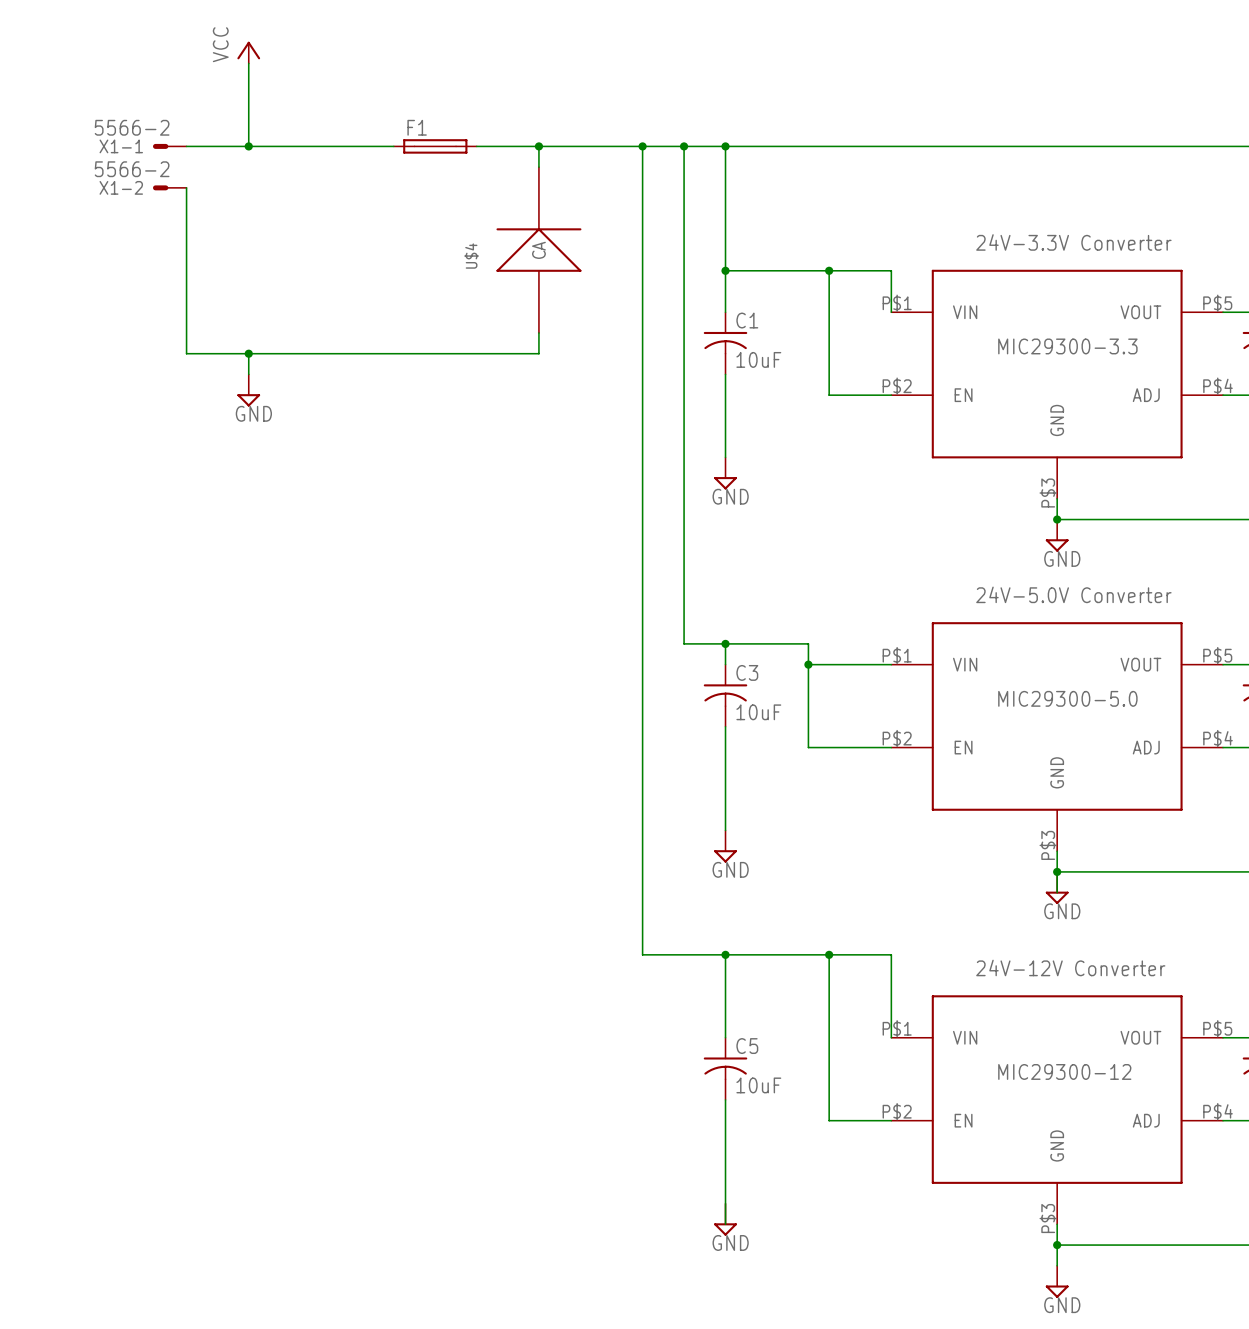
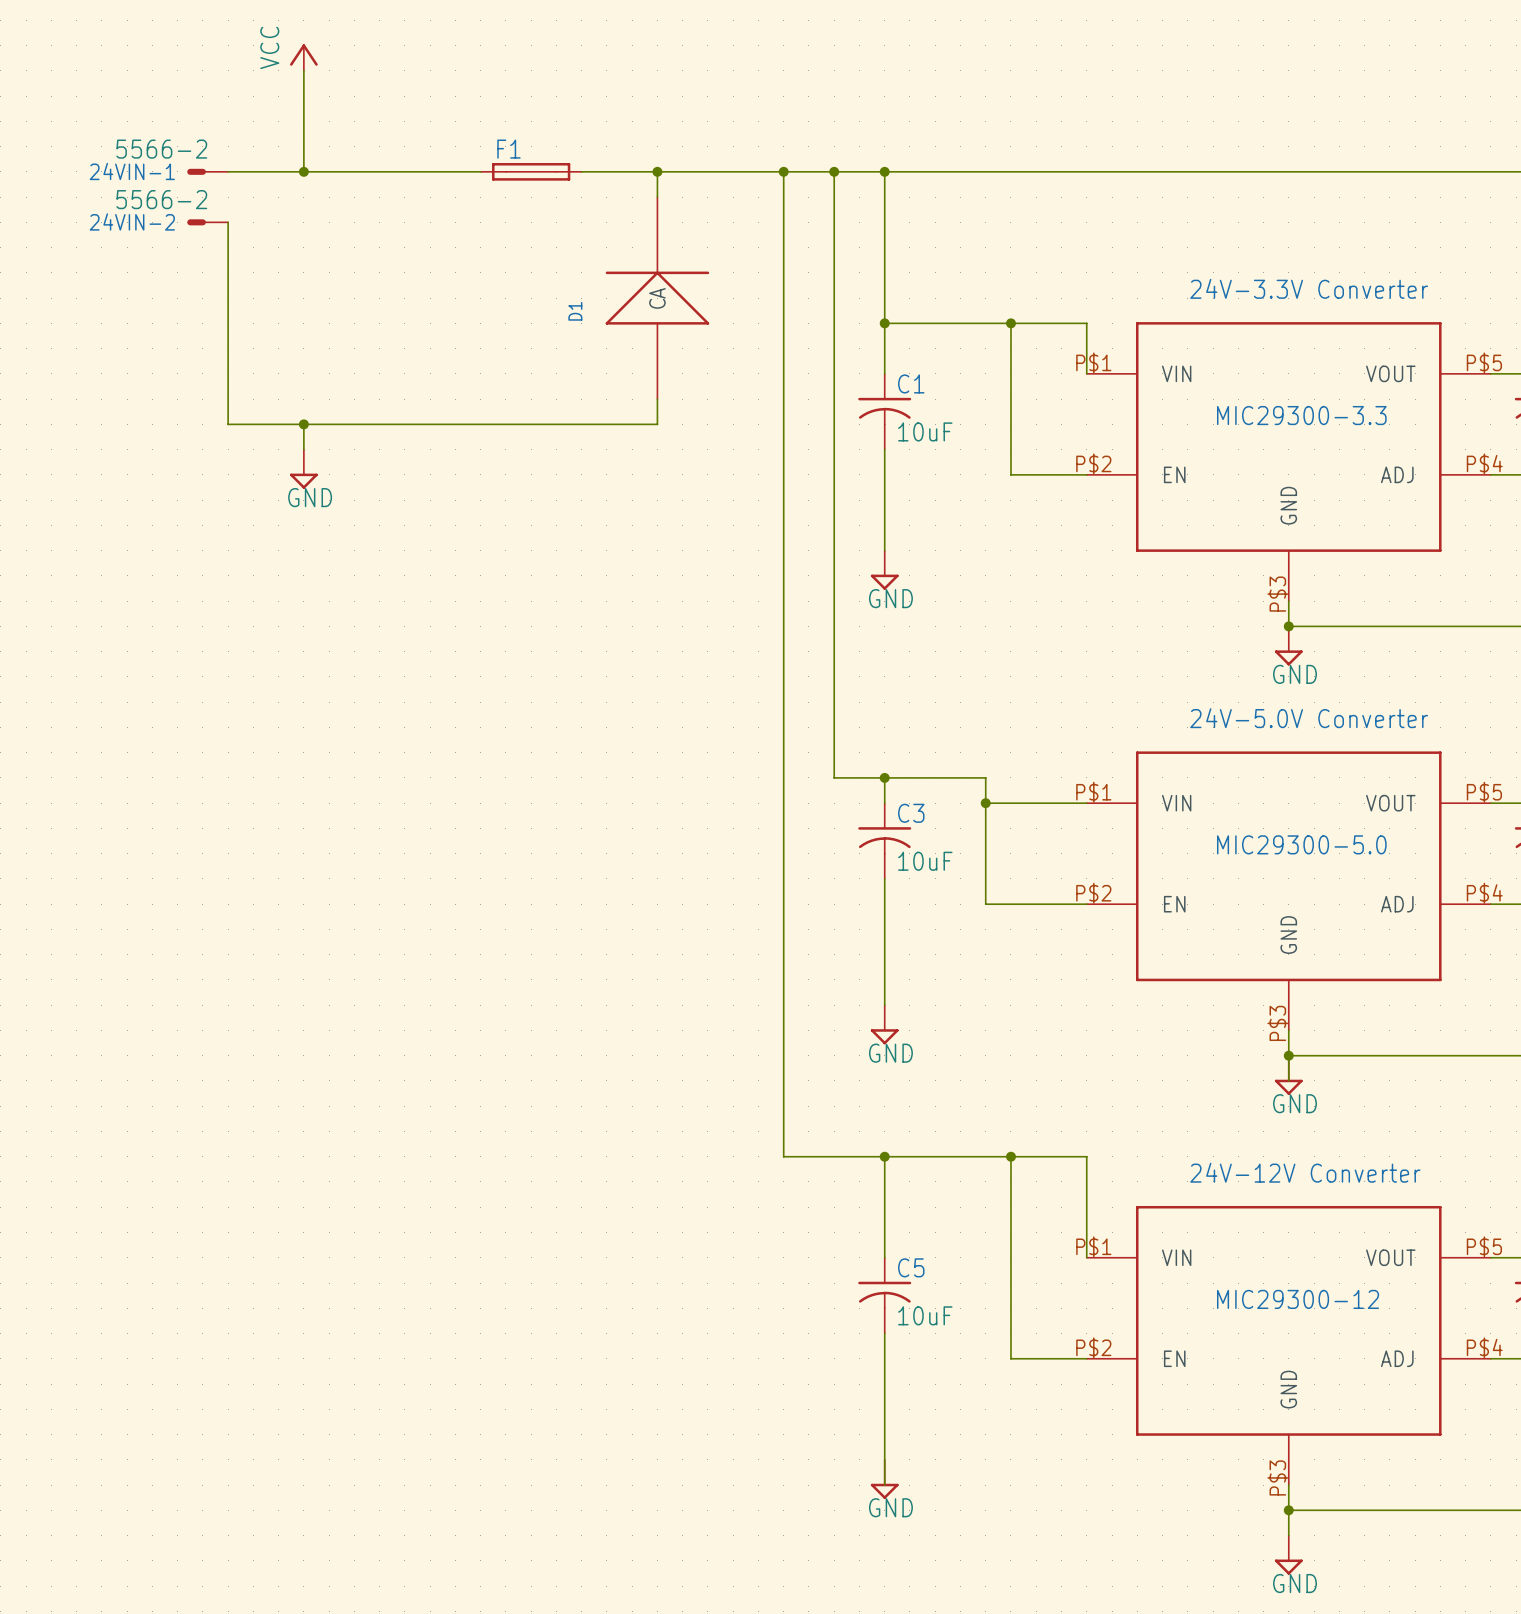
X1-1 name: X1-1 (121, 146) -> 24VIN-1 (132, 171)
X1-2 name: X1-2 (121, 187) -> 24VIN-2 (132, 221)
U$4 name: U$4 (471, 256) -> D1 (575, 311)

